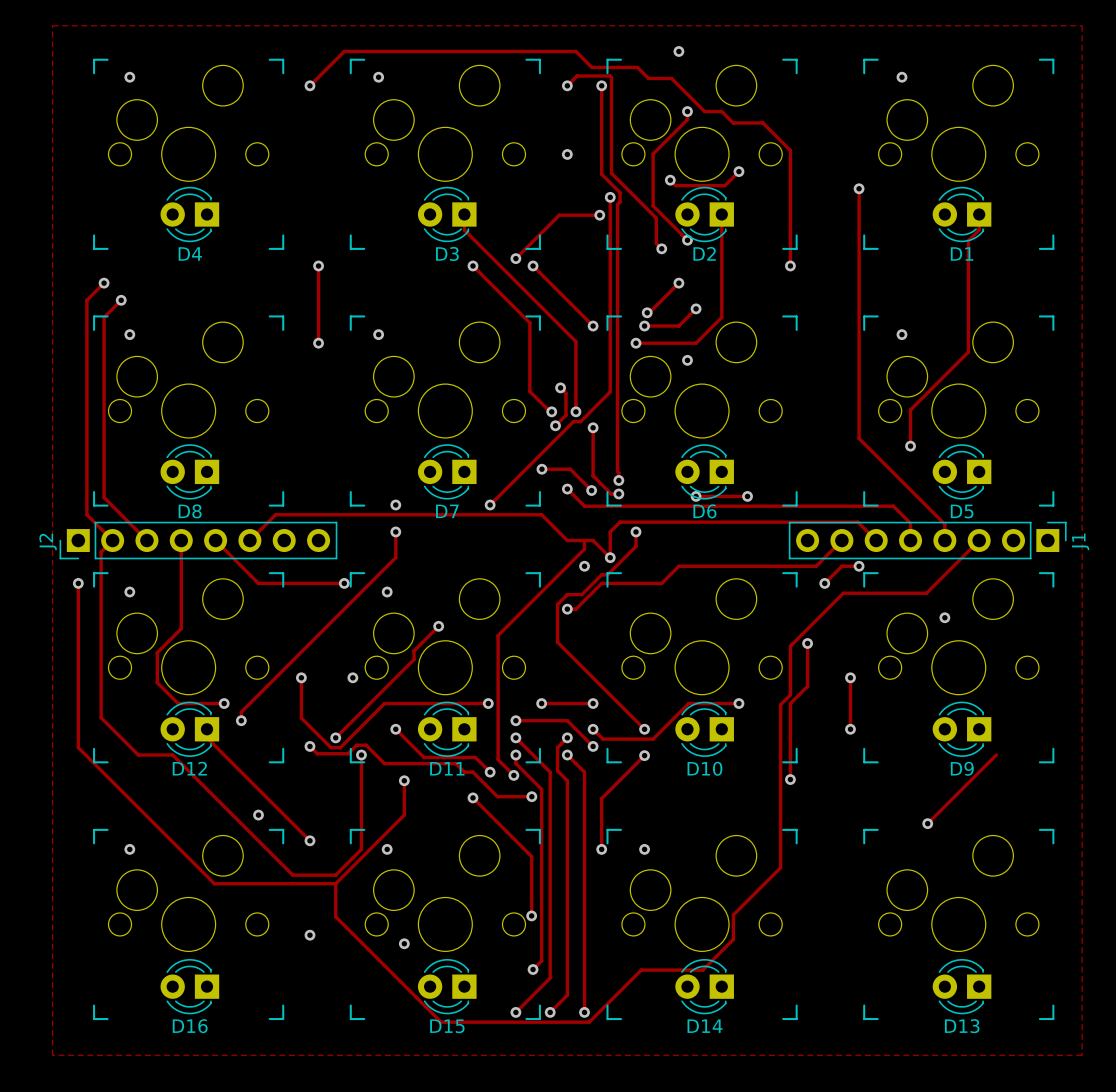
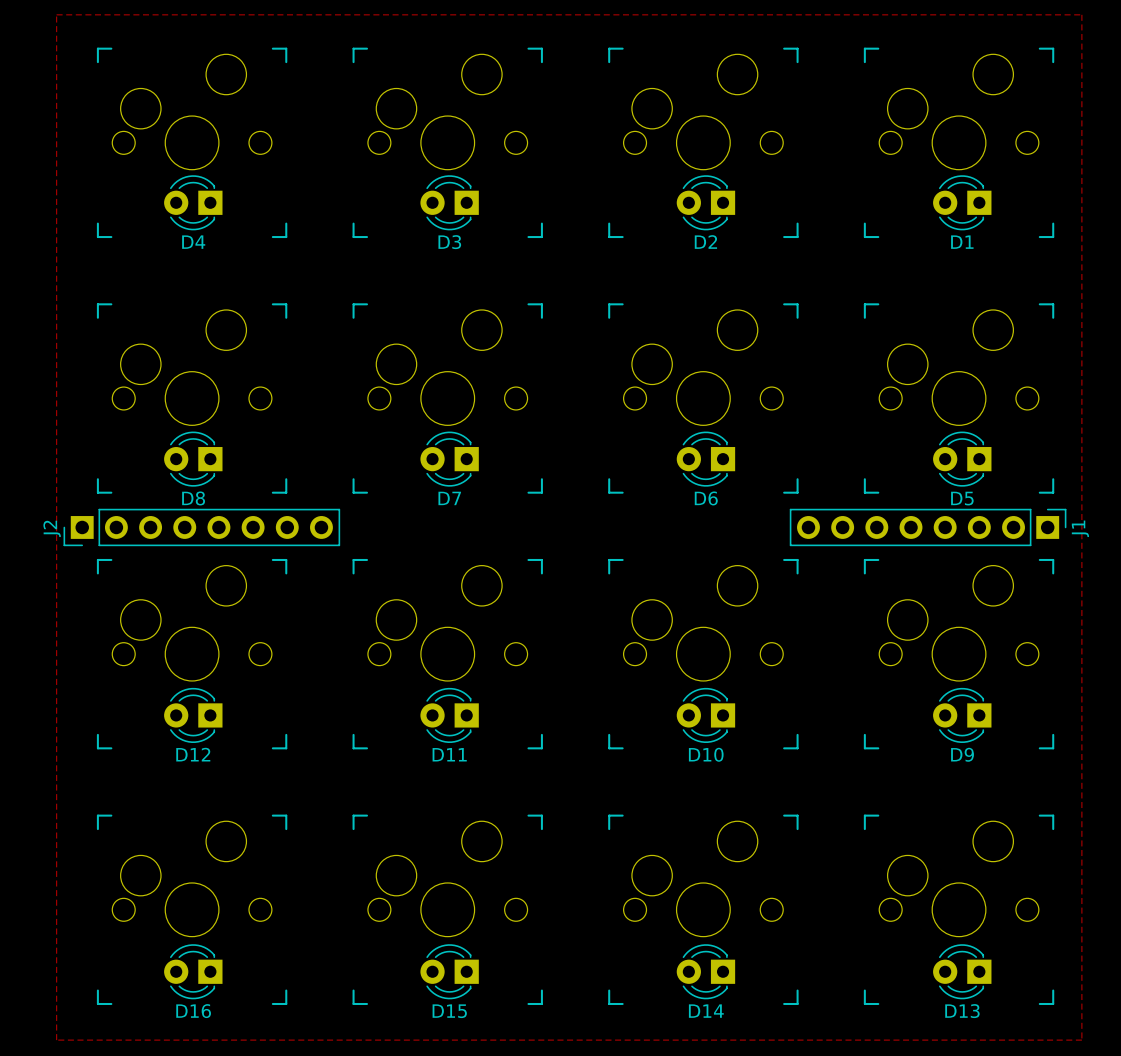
via: (678, 51) -> none
via: (129, 77) -> none
via: (378, 77) -> none
via: (901, 77) -> none
track: (309, 85) (344, 51) (575, 51) (591, 67) (637, 67) (648, 78) (671, 78) (704, 111) (721, 111) (733, 122) (762, 122) (790, 150) (790, 265) -> none
via: (309, 85) -> none
track: (567, 85) (577, 76) (611, 77) (611, 173) (656, 218) (656, 243) (661, 248) -> none
via: (567, 85) -> none
track: (601, 85) (601, 174) (620, 192) (620, 202) (617, 204) (618, 480) -> none
via: (601, 85) -> none
track: (687, 111) (687, 119) (653, 153) (653, 205) (687, 240) -> none
via: (687, 111) -> none
via: (567, 154) -> none
track: (738, 171) (724, 185) (675, 185) (670, 180) -> none
via: (738, 171) -> none
via: (670, 180) -> none
track: (859, 188) (859, 438) (944, 524) (944, 540) -> none
via: (859, 188) -> none
track: (610, 197) (610, 392) (580, 421) (573, 421) (490, 504) -> none
via: (610, 197) -> none
track: (464, 214) (464, 230) (575, 341) (575, 411) -> none
track: (721, 214) (721, 317) (696, 343) (636, 343) -> none
track: (979, 214) (979, 230) (968, 240) (968, 352) (910, 409) (910, 446) -> none
track: (599, 215) (559, 215) (515, 258) -> none
via: (599, 215) -> none
via: (687, 240) -> none
via: (661, 248) -> none
via: (515, 258) -> none
track: (318, 265) (318, 343) -> none
via: (318, 265) -> none
track: (472, 265) (529, 322) (529, 391) (551, 411) -> none
via: (472, 265) -> none
track: (533, 265) (593, 326) -> none
via: (533, 265) -> none
via: (790, 265) -> none
track: (104, 283) (86, 300) (86, 514) (112, 540) (101, 552) (101, 717) (138, 755) (172, 755) (292, 875) (335, 875) (361, 849) (361, 755) -> none
via: (104, 283) -> none
track: (678, 283) (647, 312) -> none
via: (678, 283) -> none
track: (121, 300) (104, 317) (104, 497) (146, 540) -> none
via: (121, 300) -> none
track: (696, 308) (678, 326) (644, 326) -> none
via: (696, 308) -> none
via: (647, 312) -> none
via: (593, 326) -> none
via: (644, 326) -> none
via: (129, 334) -> none
via: (378, 334) -> none
via: (901, 334) -> none
via: (318, 343) -> none
via: (636, 343) -> none
via: (687, 360) -> none
track: (560, 387) (565, 393) (565, 415) (555, 425) -> none
via: (560, 387) -> none
via: (551, 411) -> none
via: (575, 411) -> none
via: (555, 425) -> none
track: (593, 427) (593, 475) (611, 493) (618, 493) -> none
via: (593, 427) -> none
via: (910, 446) -> none
track: (541, 469) (570, 469) (591, 490) -> none
via: (541, 469) -> none
via: (618, 480) -> none
track: (567, 489) (584, 506) (893, 506) (910, 523) (910, 540) -> none
via: (567, 489) -> none
via: (591, 490) -> none
via: (618, 493) -> none
track: (696, 496) (747, 496) -> none
via: (696, 496) -> none
via: (747, 496) -> none
via: (395, 504) -> none
via: (490, 504) -> none
track: (395, 531) (395, 557) (241, 712) (241, 720) -> none
via: (395, 531) -> none
track: (636, 531) (636, 546) (607, 574) (601, 574) (581, 594) (567, 594) (557, 604) (557, 642) (644, 729) -> none
via: (636, 531) -> none
track: (181, 540) (181, 628) (157, 652) (157, 682) (178, 703) (224, 703) -> none
track: (215, 540) (258, 583) (344, 583) -> none
track: (249, 540) (275, 514) (541, 514) (567, 540) (593, 540) (610, 557) (610, 531) (620, 522) (857, 522) (876, 540) -> none
track: (584, 540) (584, 549) (498, 635) (498, 759) (513, 775) -> none
track: (841, 540) (816, 566) (678, 566) (661, 583) (601, 583) (575, 609) (567, 609) -> none
track: (979, 540) (926, 593) (843, 593) (790, 646) (790, 694) (780, 704) (780, 867) (733, 915) (733, 939) (702, 970) (641, 970) (589, 1022) (441, 1022) (335, 916) (335, 883) (404, 815) (404, 780) -> none
via: (610, 557) -> none
via: (584, 566) -> none
track: (859, 566) (841, 566) (824, 583) -> none
via: (859, 566) -> none
track: (78, 583) (78, 747) (214, 883) (335, 883) -> none
via: (78, 583) -> none
via: (344, 583) -> none
via: (824, 583) -> none
via: (129, 592) -> none
via: (387, 592) -> none
via: (567, 609) -> none
via: (944, 617) -> none
track: (438, 626) (414, 650) (414, 659) (335, 737) -> none
via: (438, 626) -> none
track: (807, 643) (807, 686) (790, 703) (790, 779) -> none
via: (807, 643) -> none
track: (301, 677) (301, 718) (331, 747) (340, 747) (384, 703) (488, 703) -> none
via: (301, 677) -> none
via: (352, 677) -> none
track: (850, 677) (850, 729) -> none
via: (850, 677) -> none
via: (224, 703) -> none
via: (488, 703) -> none
track: (541, 703) (593, 703) -> none
via: (541, 703) -> none
via: (593, 703) -> none
track: (738, 703) (688, 703) (653, 739) (602, 739) (593, 729) -> none
via: (738, 703) -> none
via: (241, 720) -> none
track: (515, 720) (567, 720) (593, 746) -> none
via: (515, 720) -> none
track: (207, 729) (207, 737) (309, 840) -> none
track: (395, 729) (424, 757) (475, 757) (490, 772) -> none
via: (395, 729) -> none
via: (593, 729) -> none
via: (644, 729) -> none
via: (850, 729) -> none
via: (335, 737) -> none
track: (515, 737) (550, 772) (550, 978) (515, 1012) -> none
via: (515, 737) -> none
track: (567, 737) (557, 747) (557, 770) (567, 780) (567, 995) (550, 1012) -> none
via: (567, 737) -> none
track: (309, 746) (317, 753) (348, 753) (356, 745) (366, 745) (384, 763) (455, 763) (464, 772) (472, 772) (497, 796) (531, 796) -> none
via: (309, 746) -> none
via: (593, 746) -> none
via: (361, 755) -> none
track: (515, 755) (515, 763) (541, 789) (541, 960) (533, 969) -> none
via: (515, 755) -> none
track: (567, 755) (584, 772) (584, 1012) -> none
via: (567, 755) -> none
track: (644, 755) (601, 798) (601, 849) -> none
via: (644, 755) -> none
track: (996, 755) (927, 823) -> none
via: (490, 772) -> none
via: (513, 775) -> none
via: (790, 779) -> none
via: (404, 780) -> none
via: (531, 796) -> none
track: (472, 797) (531, 856) (531, 915) -> none
via: (472, 797) -> none
via: (258, 815) -> none
via: (927, 823) -> none
via: (309, 840) -> none
via: (129, 849) -> none
via: (387, 849) -> none
via: (601, 849) -> none
via: (644, 849) -> none
via: (531, 915) -> none
via: (309, 935) -> none
via: (404, 943) -> none
via: (533, 969) -> none
via: (515, 1012) -> none
via: (550, 1012) -> none
via: (584, 1012) -> none

